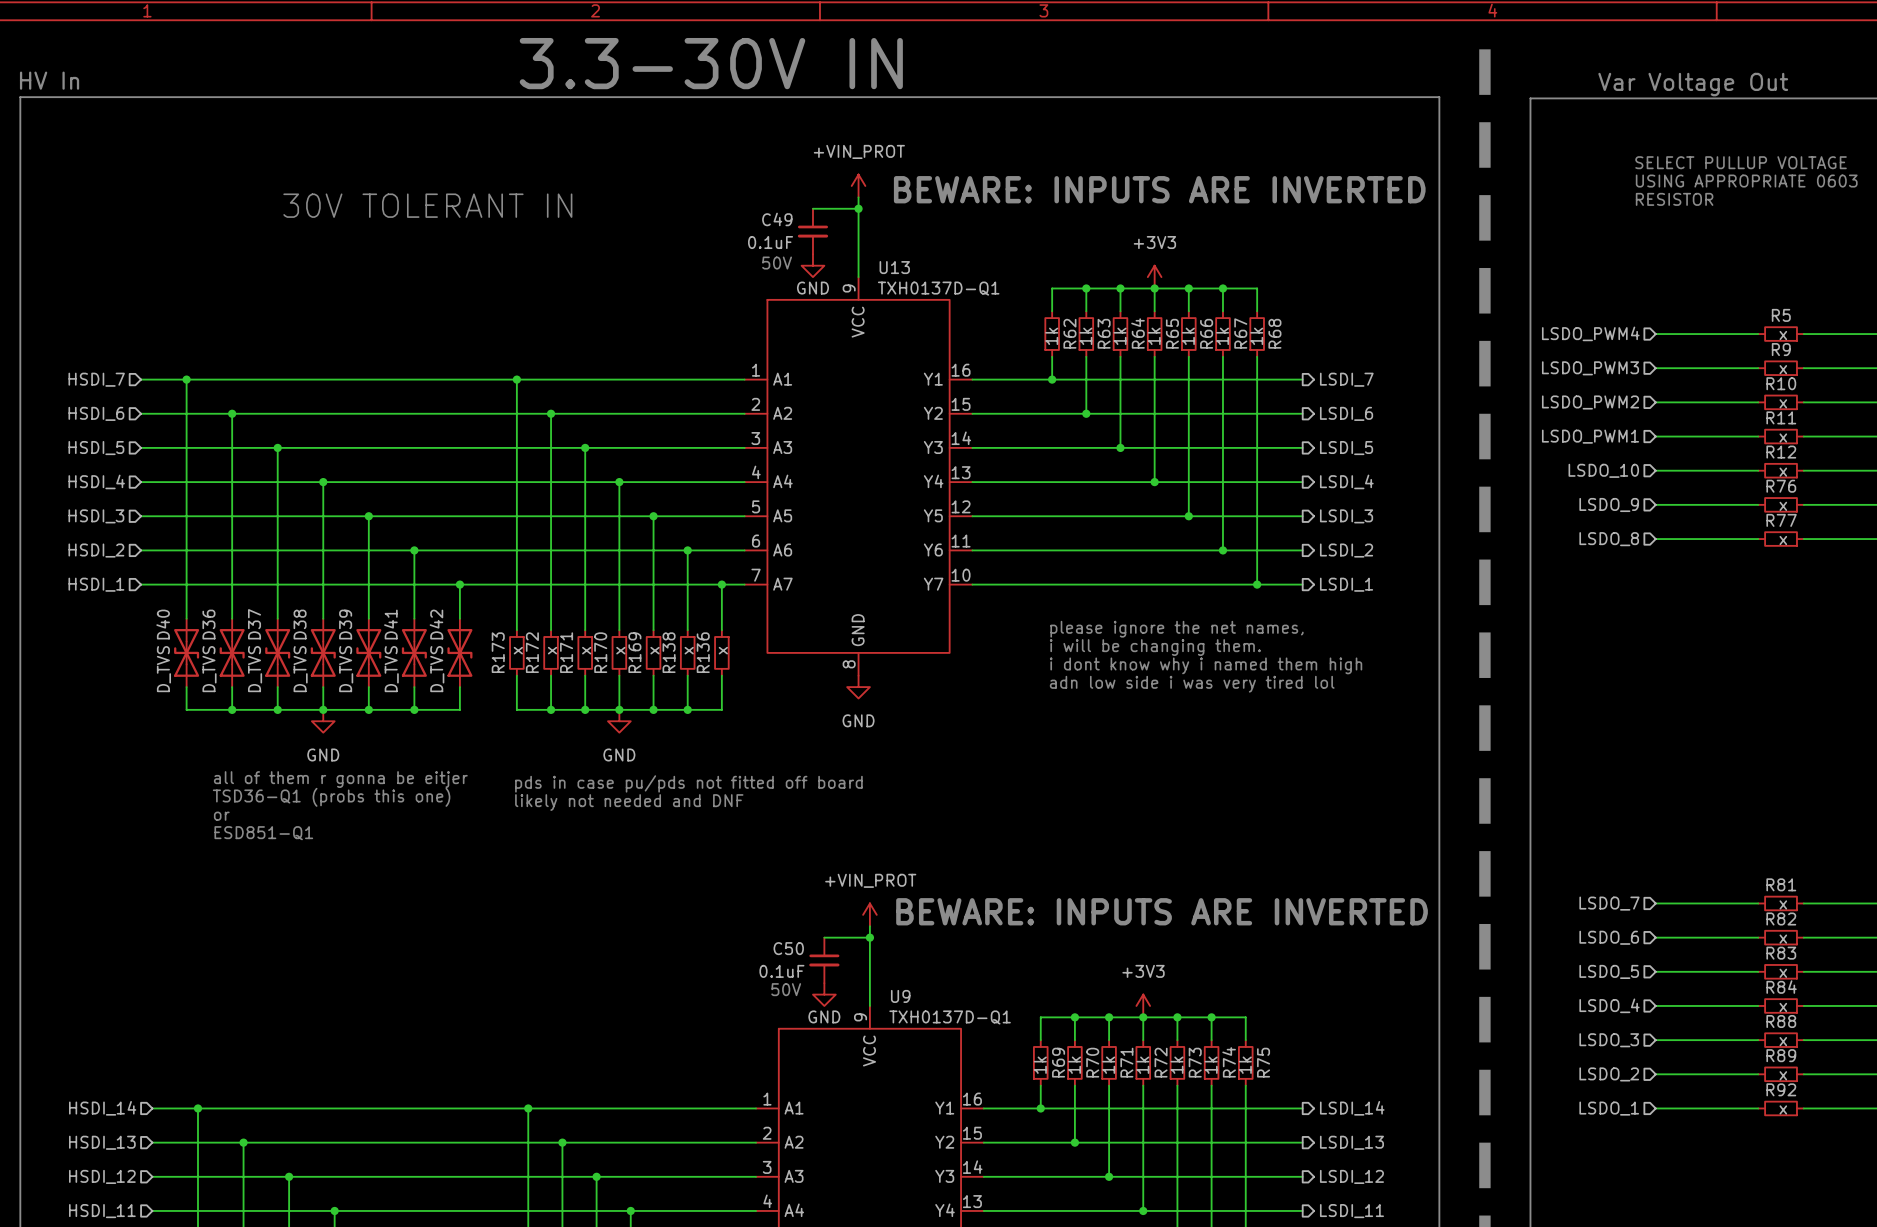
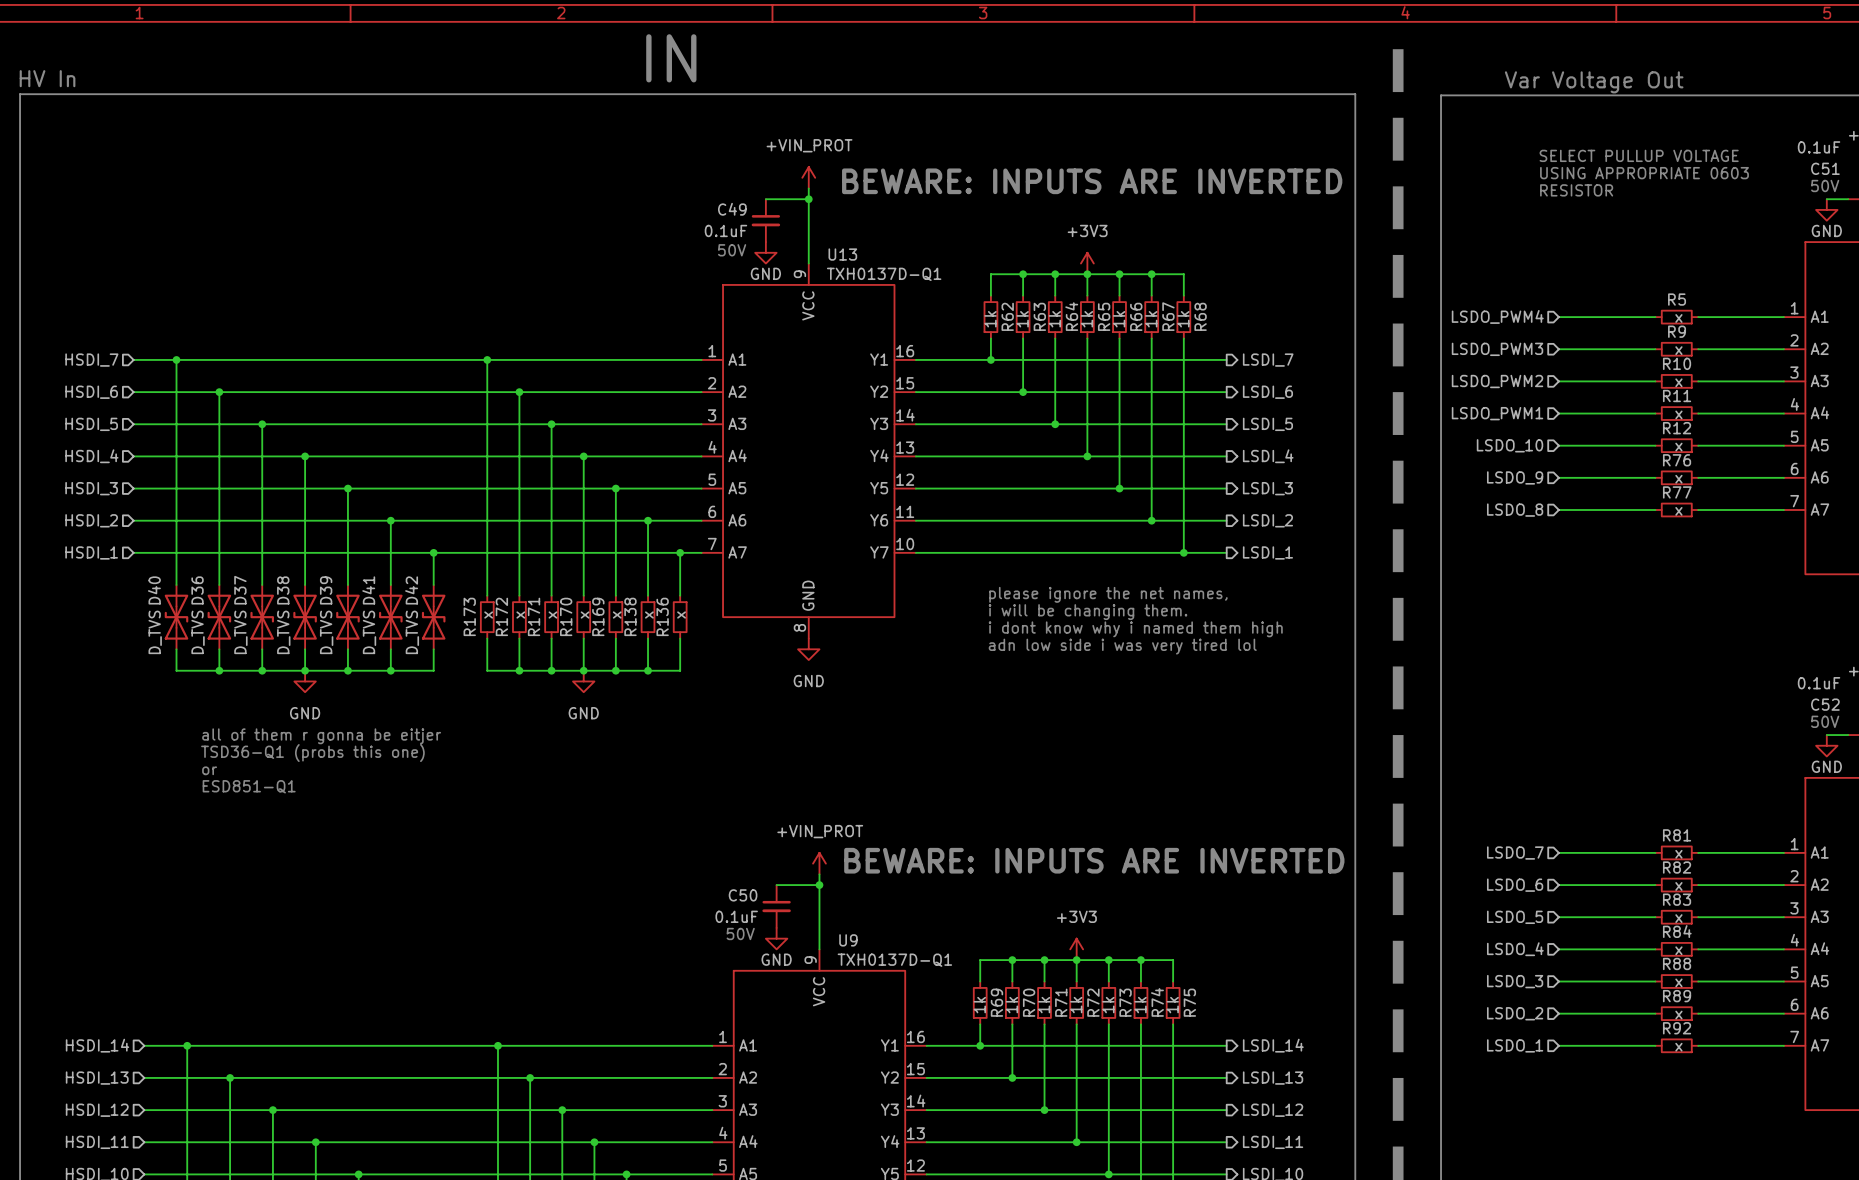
text: none -> IN (671, 58)
text: 3.3-30V IN (711, 63) -> none
text: 30V TOLERANT IN (427, 205) -> none
text: pds in case pu/pds not fitted off board (688, 783) -> none
text: likely not needed and DNF (629, 802) -> none

